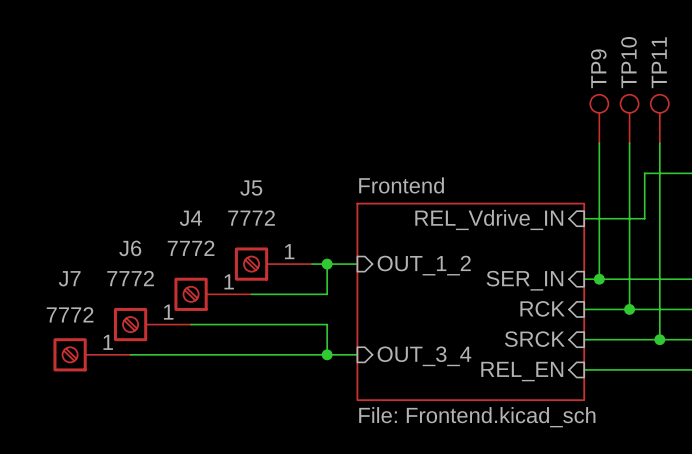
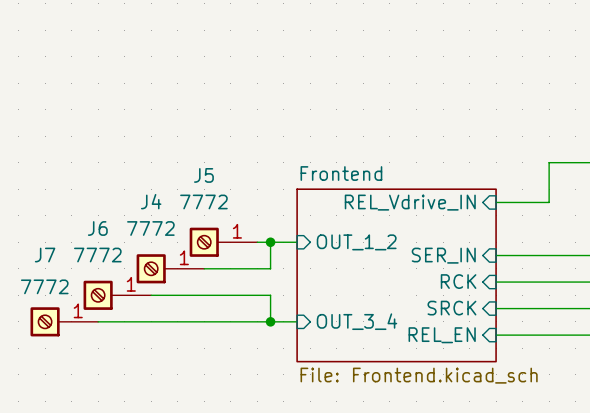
TP9: (599, 118) -> none
TP10: (629, 118) -> none
TP11: (659, 118) -> none
wire: (599, 143) (599, 279) -> none
wire: (629, 143) (629, 309) -> none
wire: (659, 143) (659, 339) -> none
junction: (599, 279) -> none
junction: (629, 309) -> none
junction: (659, 339) -> none

